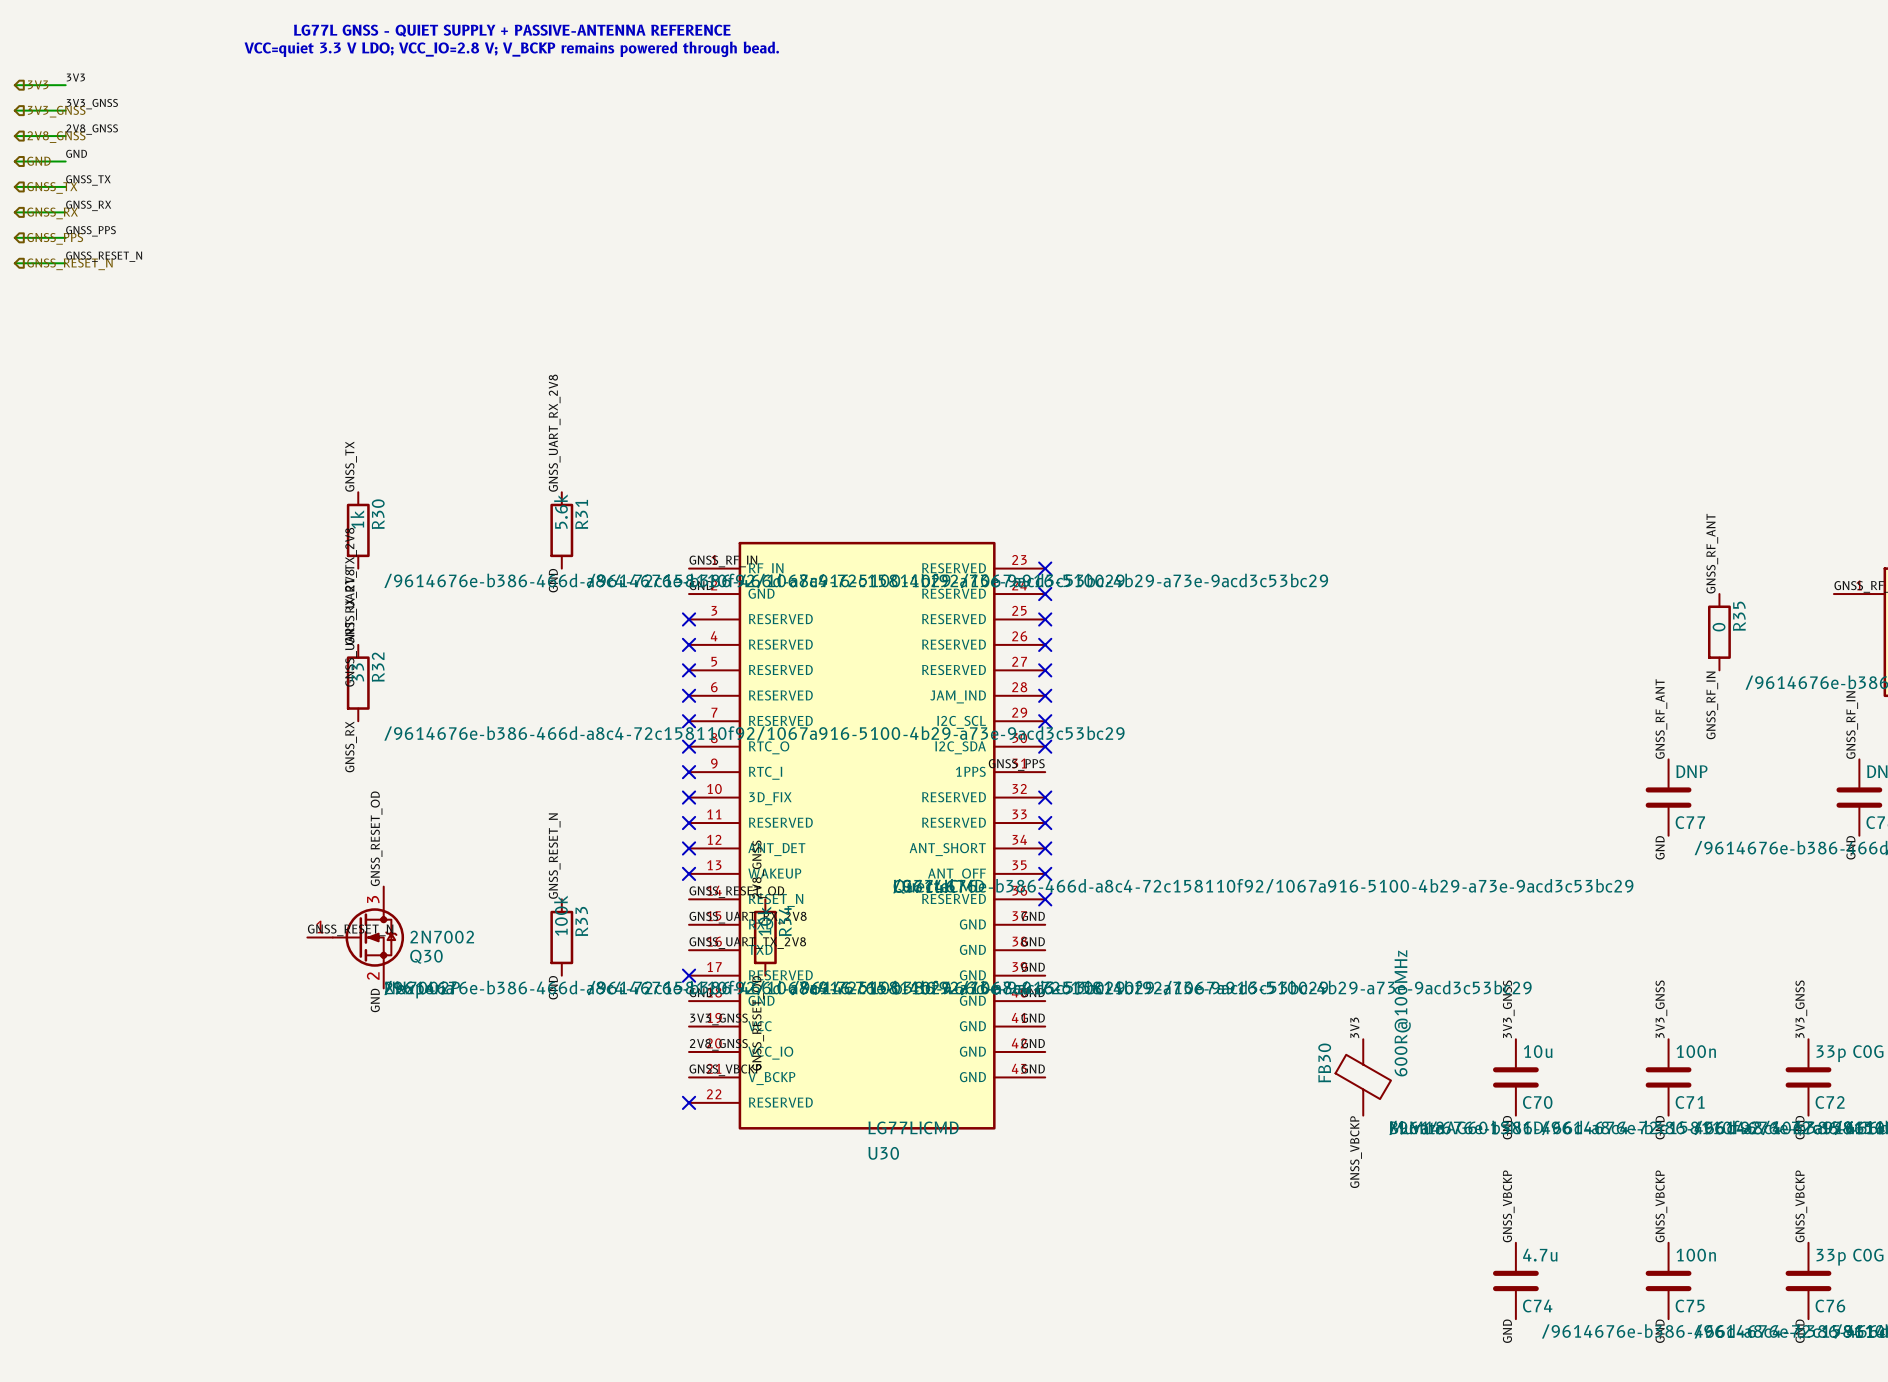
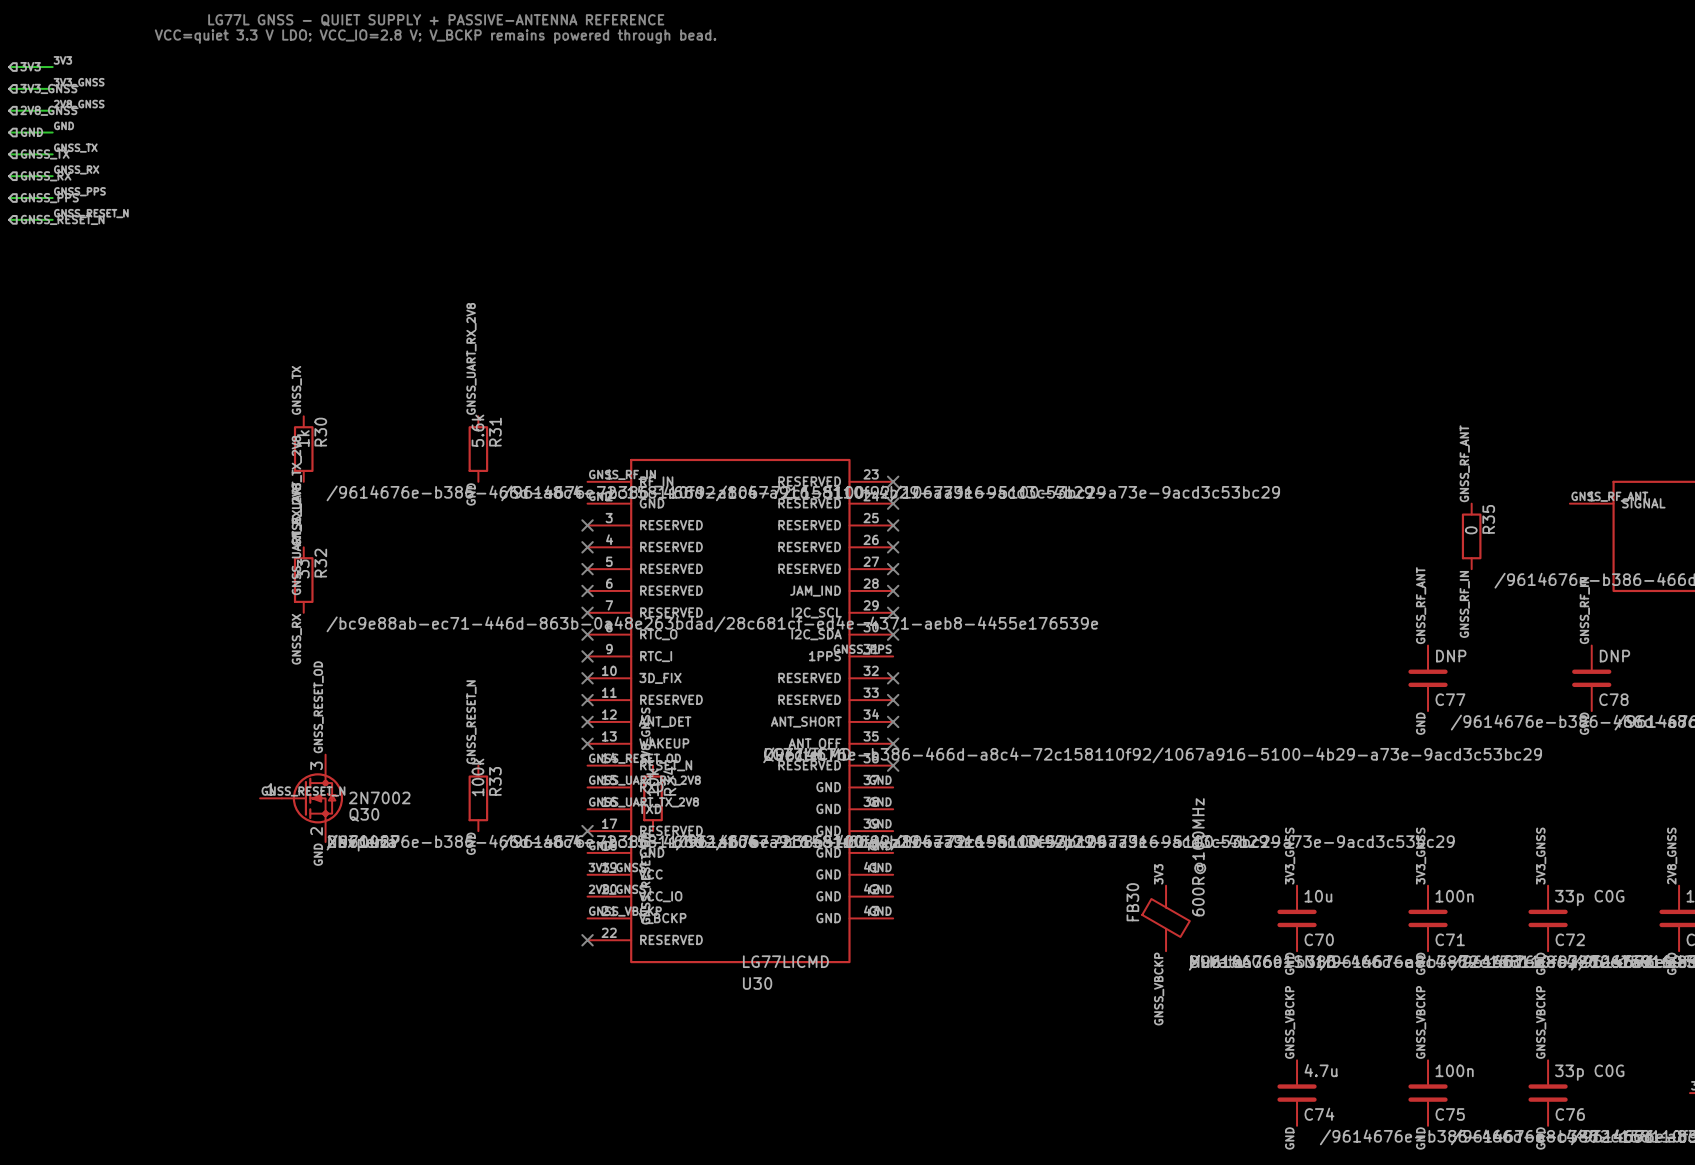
R32 text: /9614676e-b386-466d-a8c4-72c158110f92/1067a916-5100-4b29-a73e-9acd3c53bc29 (754, 733) -> /bc9e88ab-ec71-446d-863b-0a48e263bdad/28c681cf-ed4e-4371-aeb8-4455e176539e (712, 624)

